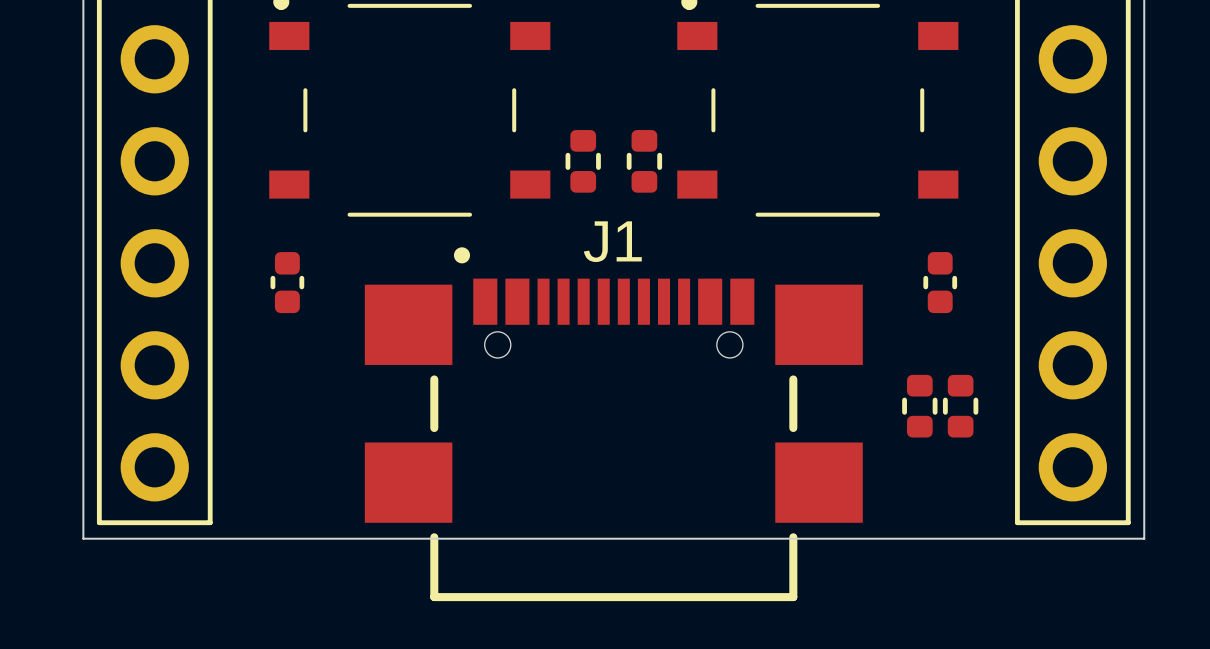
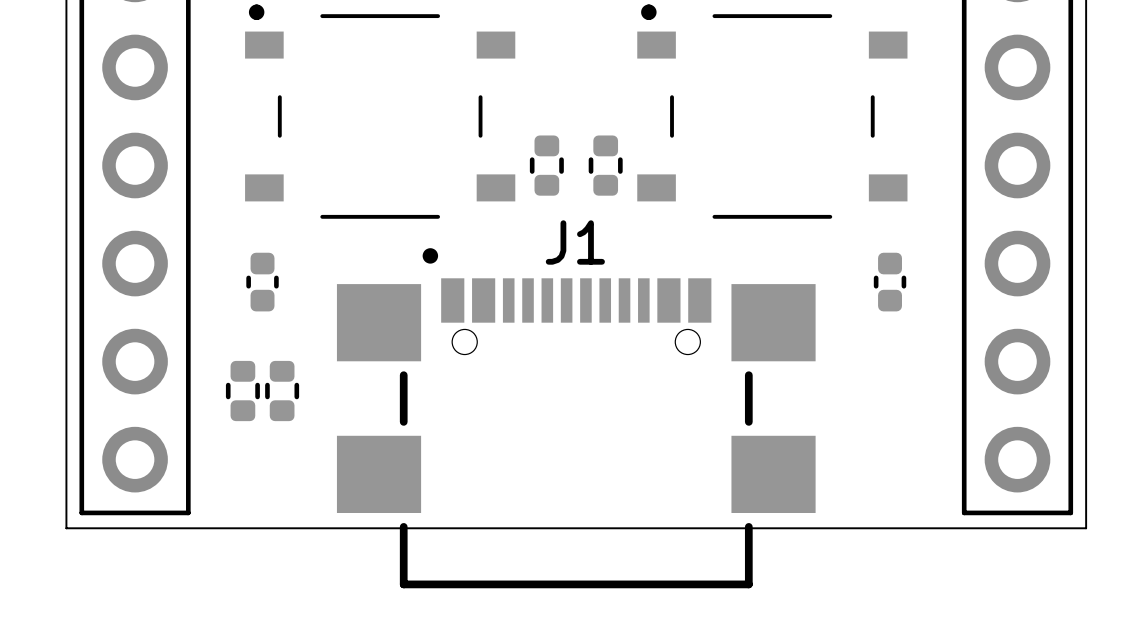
part: none -> (242, 391)
part: none -> (282, 391)
part: (919, 406) -> none
part: (960, 406) -> none

